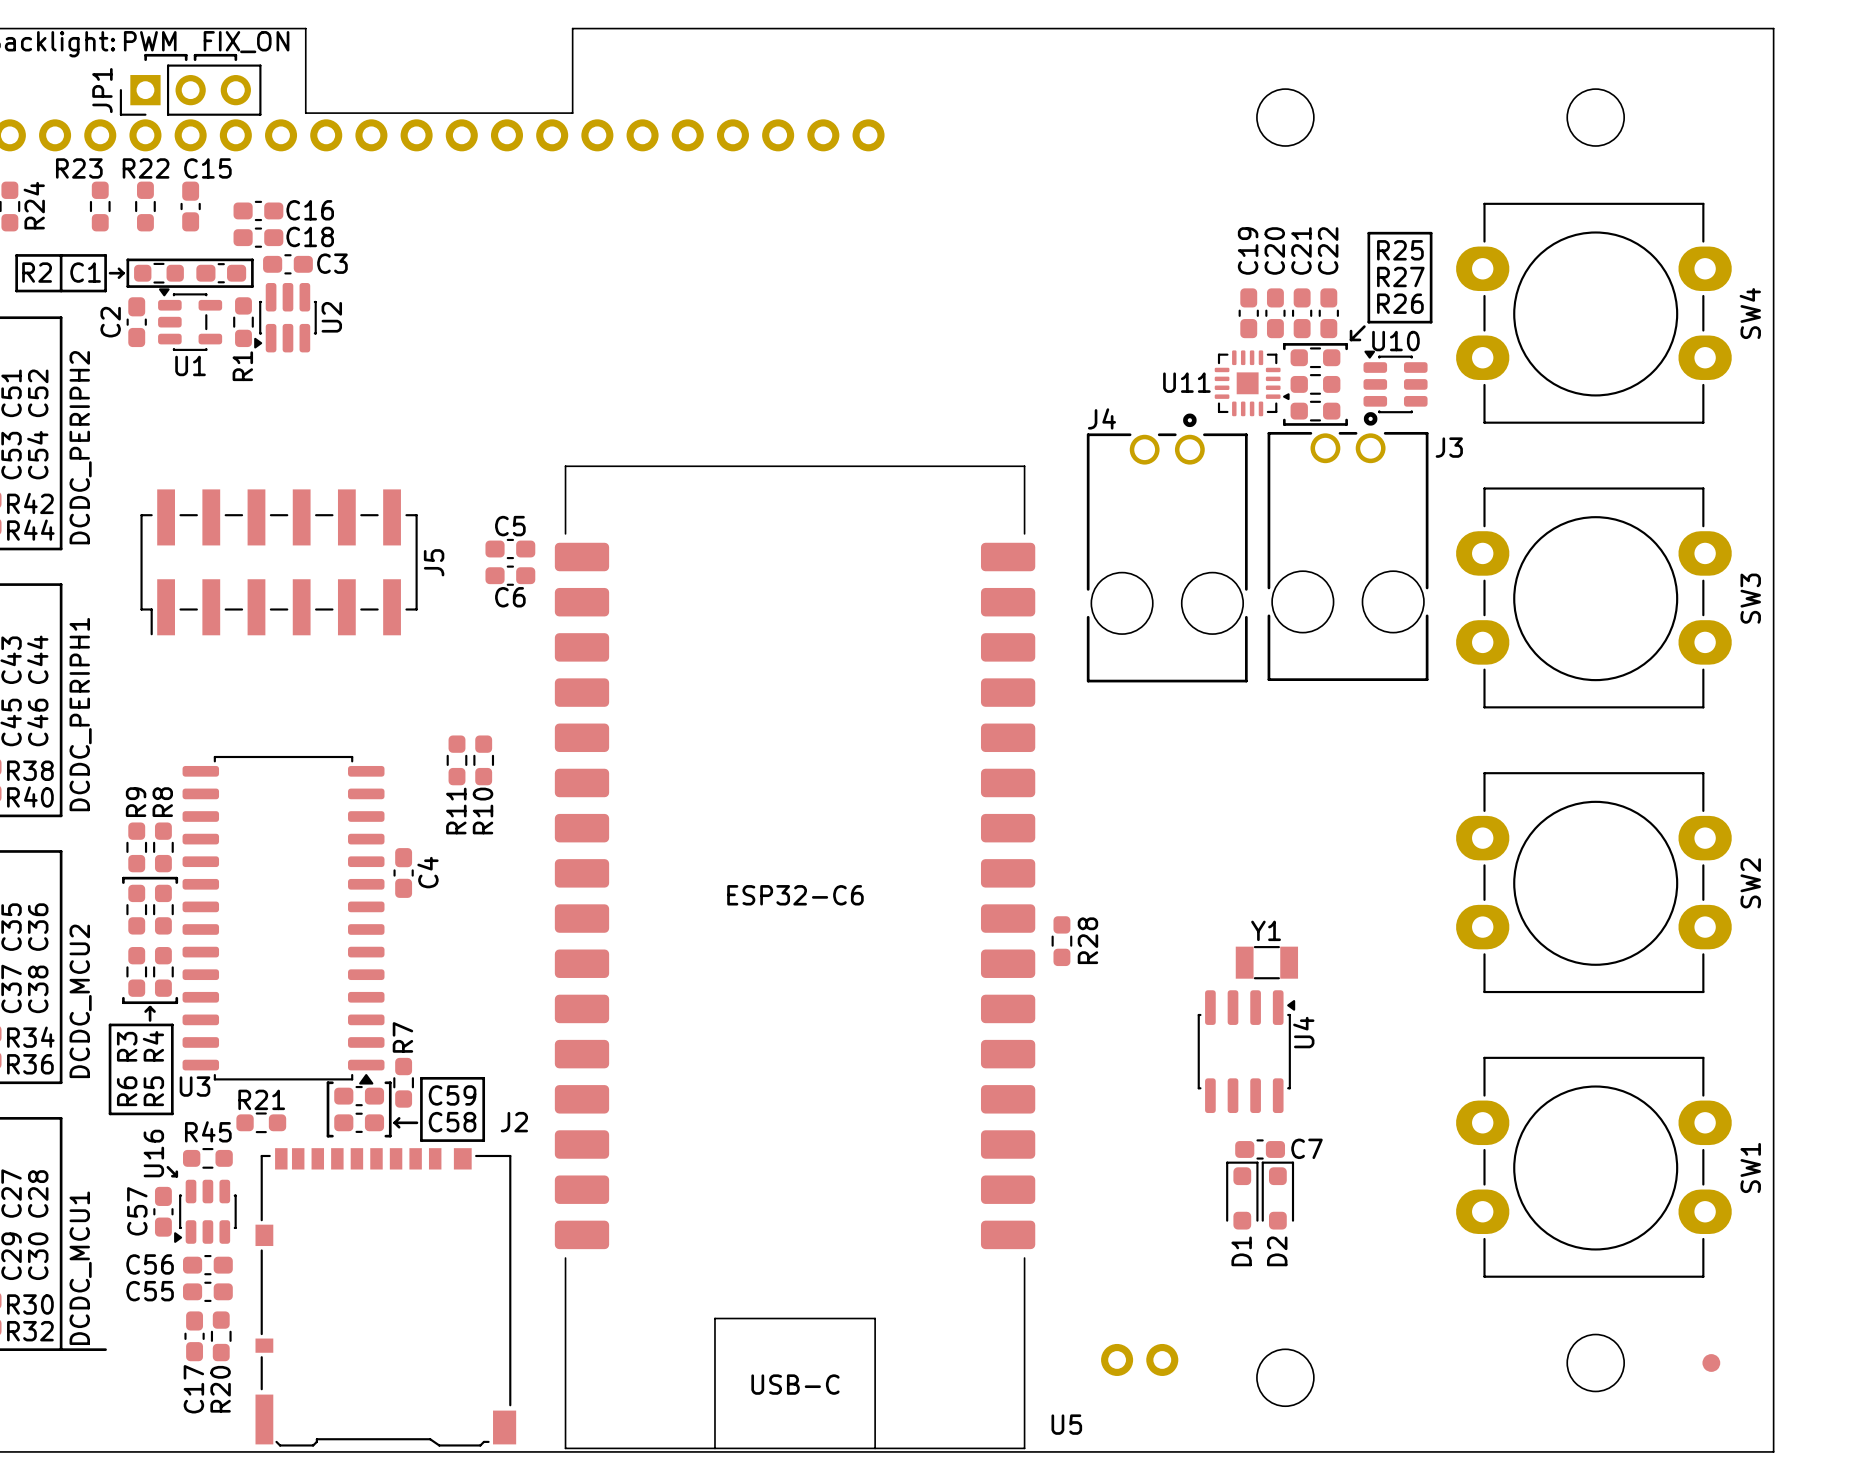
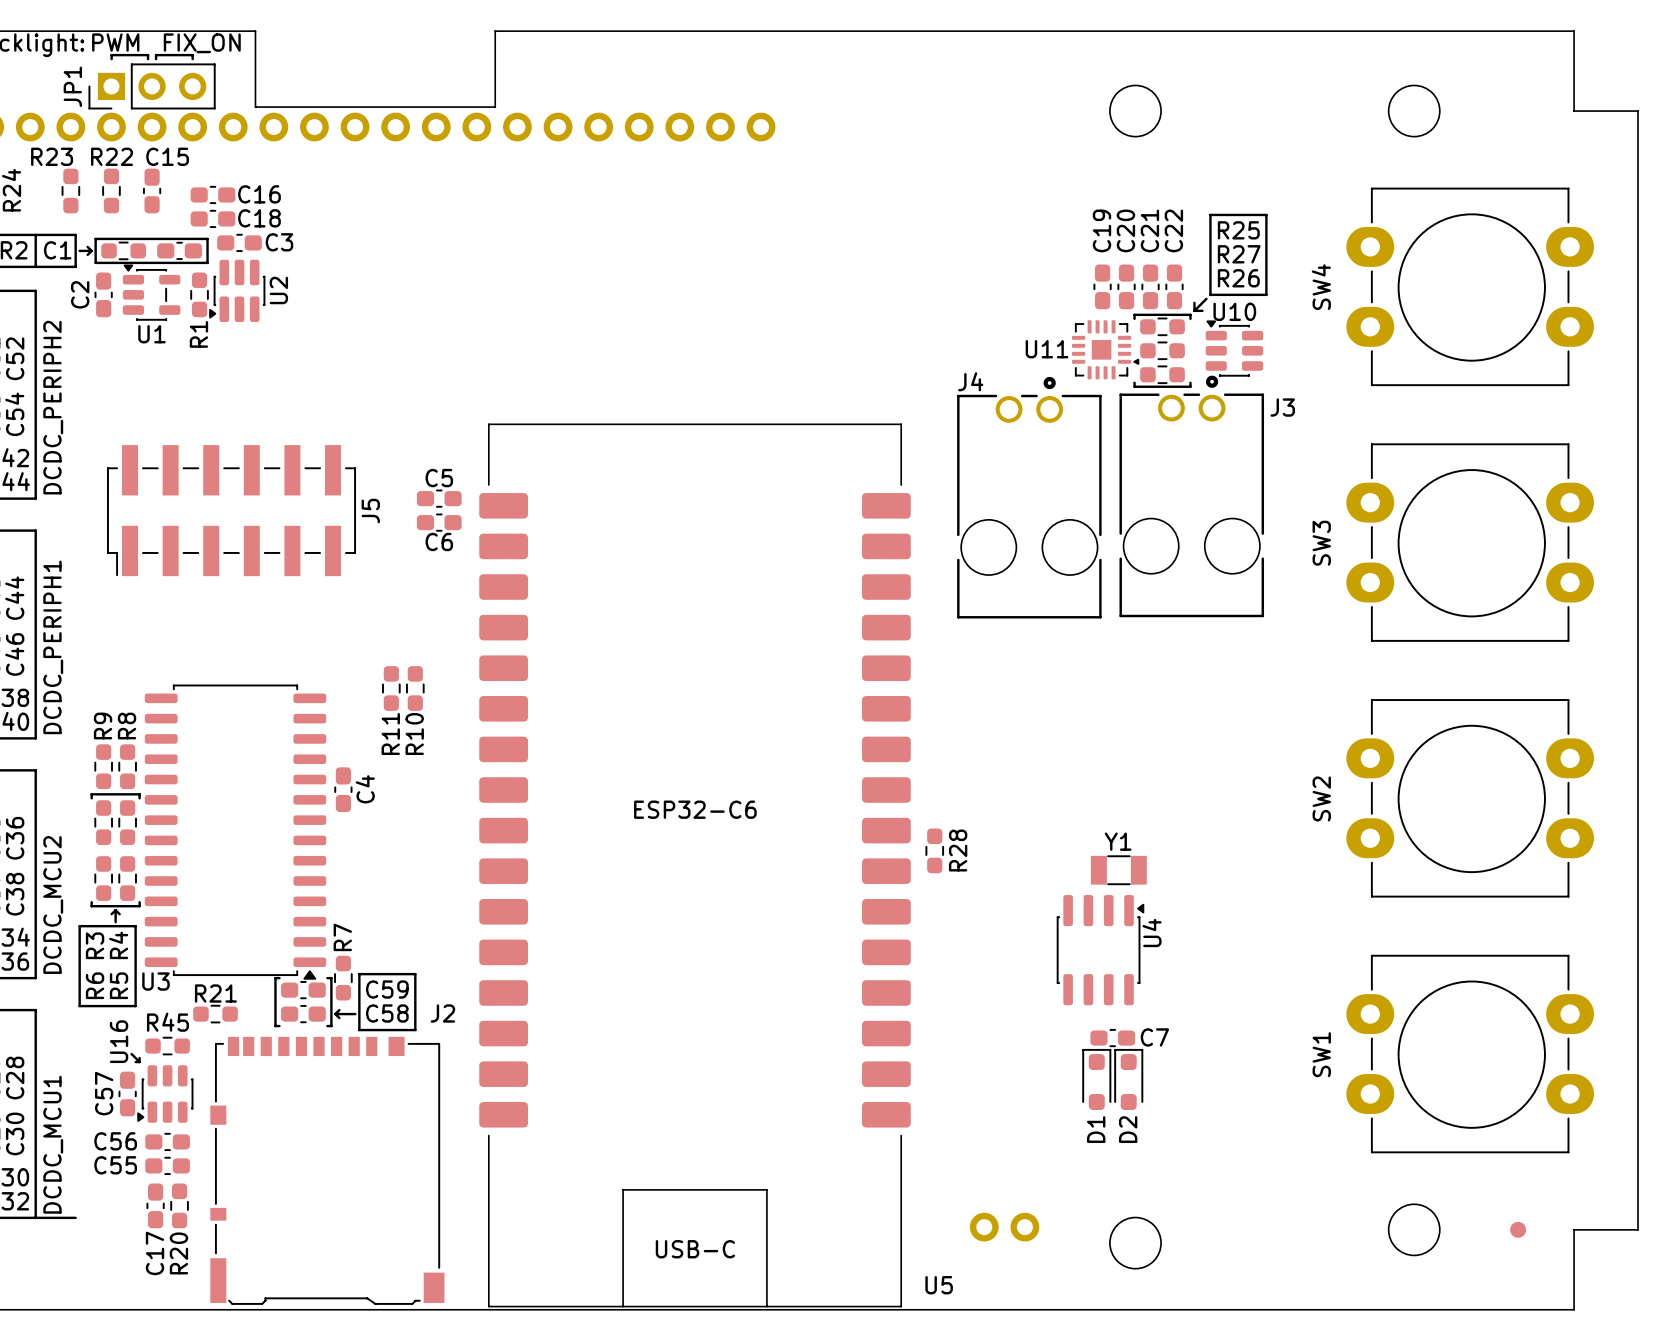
board edge: (1773, 117) (1773, 1362) -> (1574, 111) (1637, 111) (1637, 1229) (1574, 1229)
SW4 position: (1593, 313) -> (1470, 286)
SW4 name position: SW4 (1750, 313) -> SW4 (1321, 287)
SW3 position: (1593, 597) -> (1470, 542)
SW3 name position: SW3 (1750, 598) -> SW3 (1321, 543)
SW2 position: (1593, 882) -> (1470, 798)
SW2 name position: SW2 (1750, 883) -> SW2 (1321, 798)
SW1 position: (1593, 1167) -> (1470, 1054)
SW1 name position: SW1 (1750, 1167) -> SW1 (1321, 1054)

